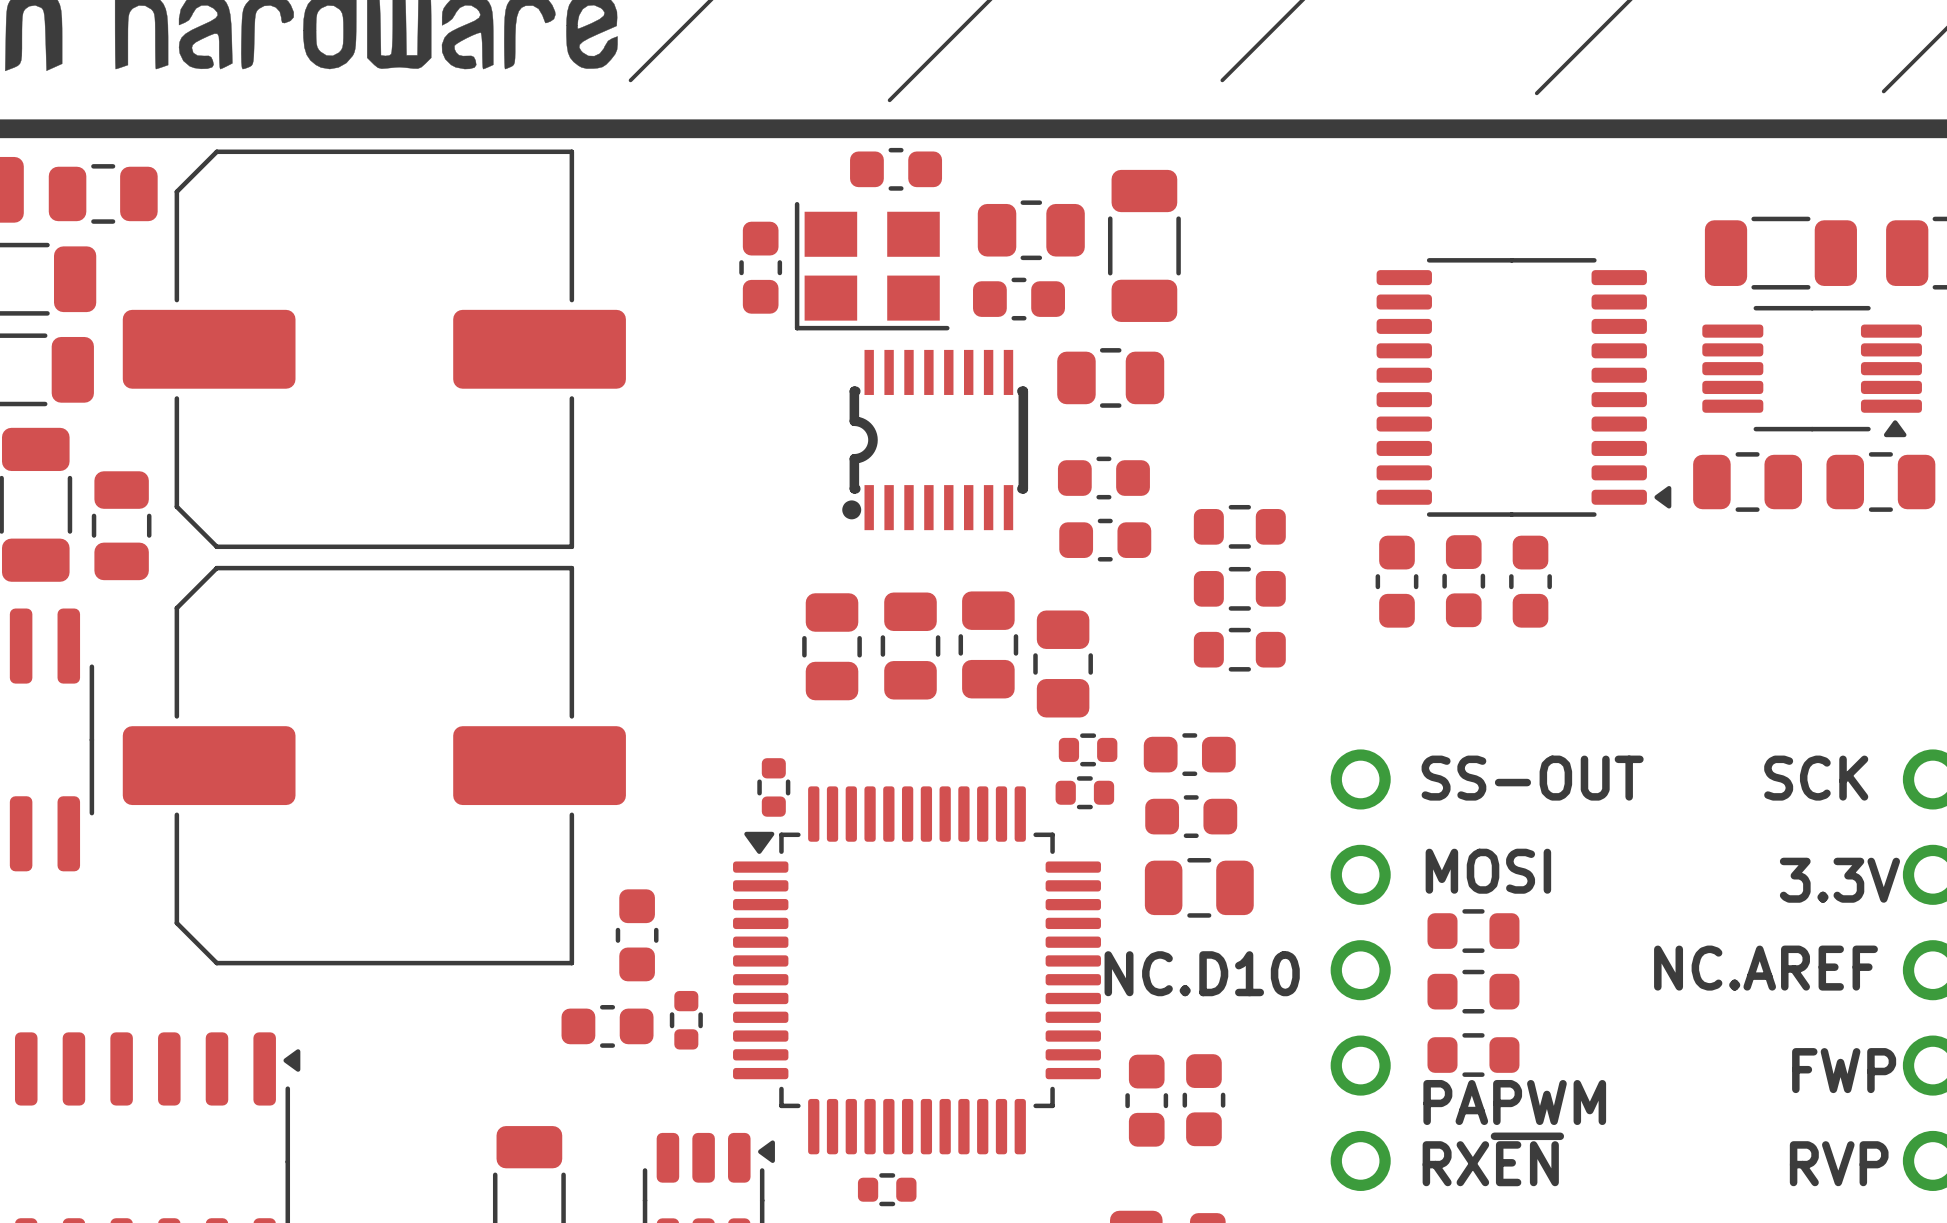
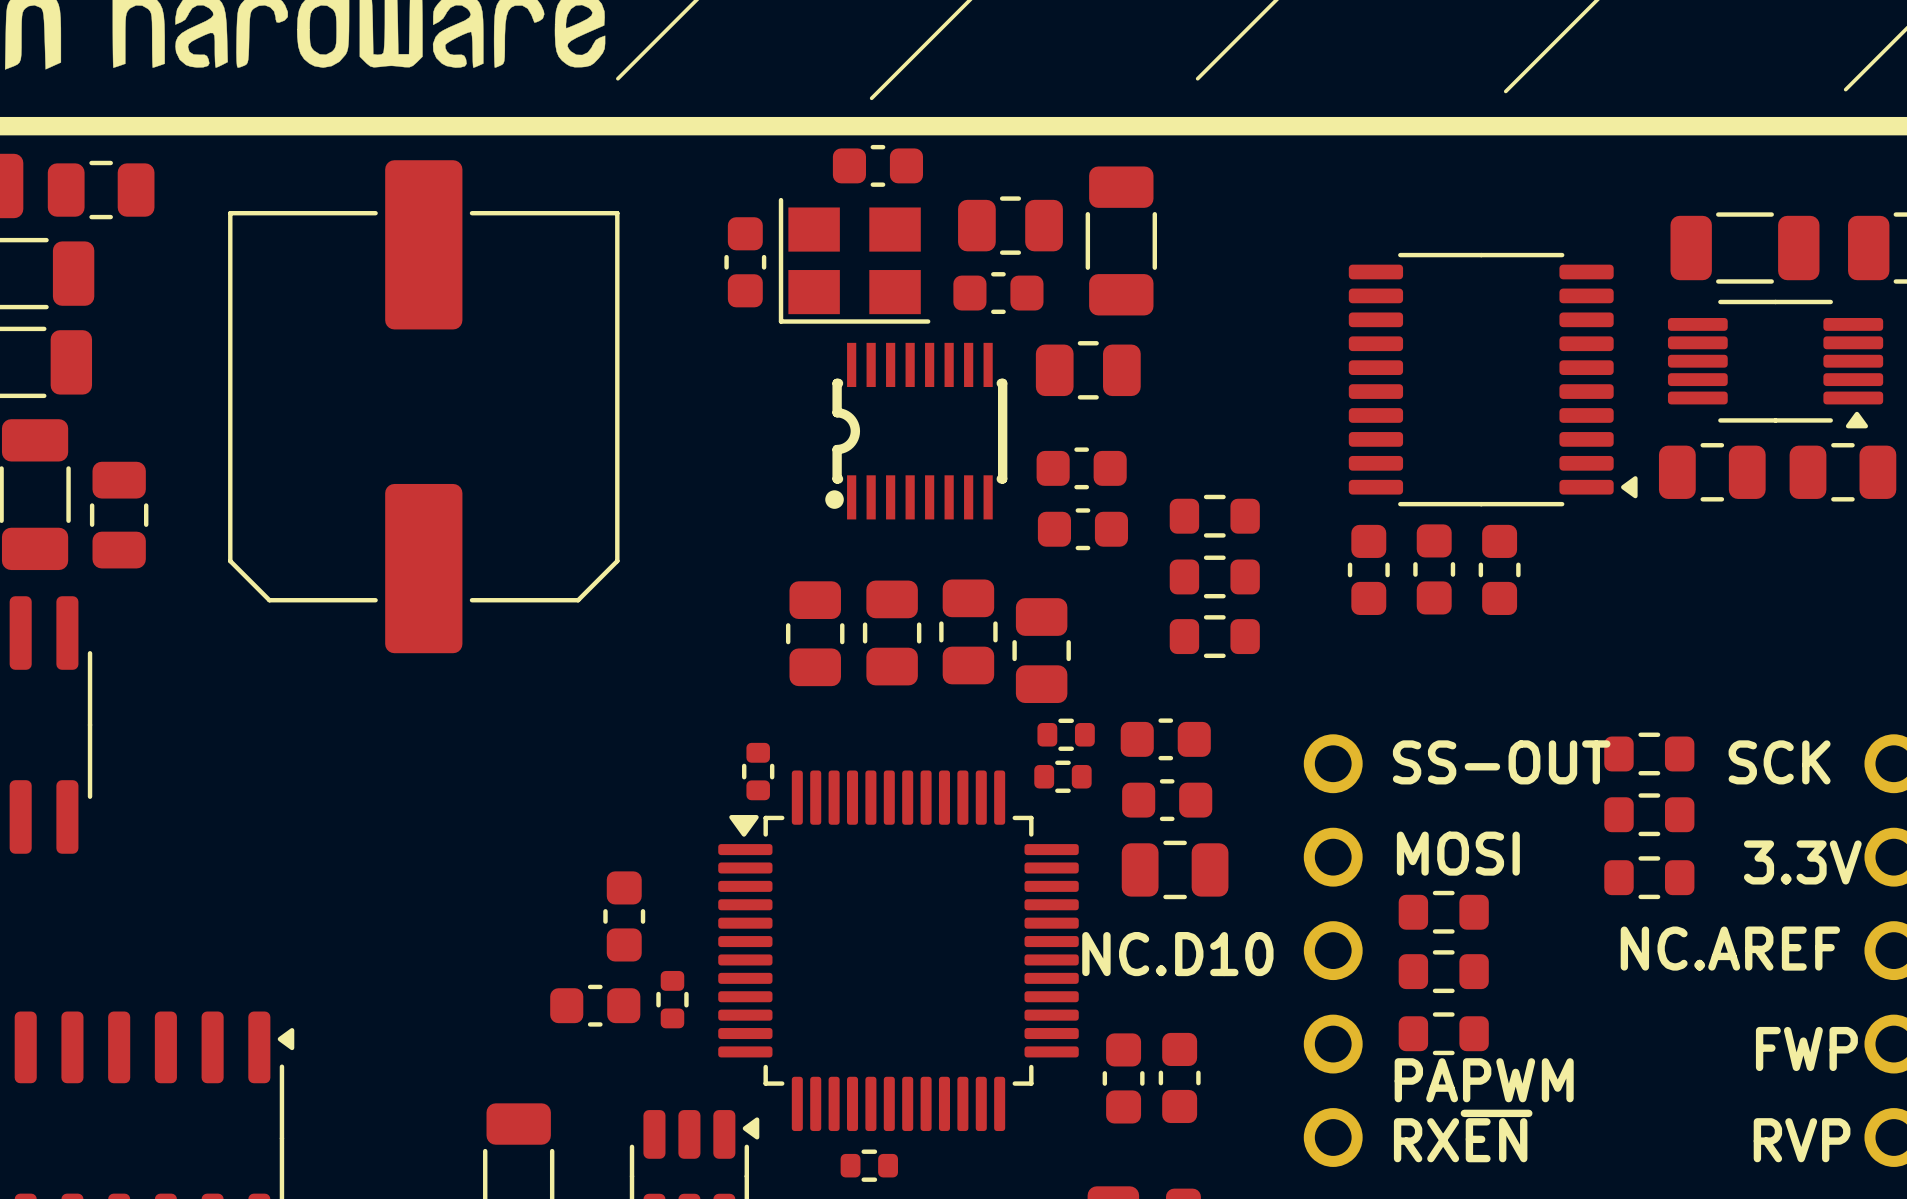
part rotation: 0° (374, 349) -> 90° counterclockwise (423, 406)
part: (374, 765) -> none
part: none -> (1649, 753)
part: none -> (1649, 814)
part: none -> (1649, 877)

